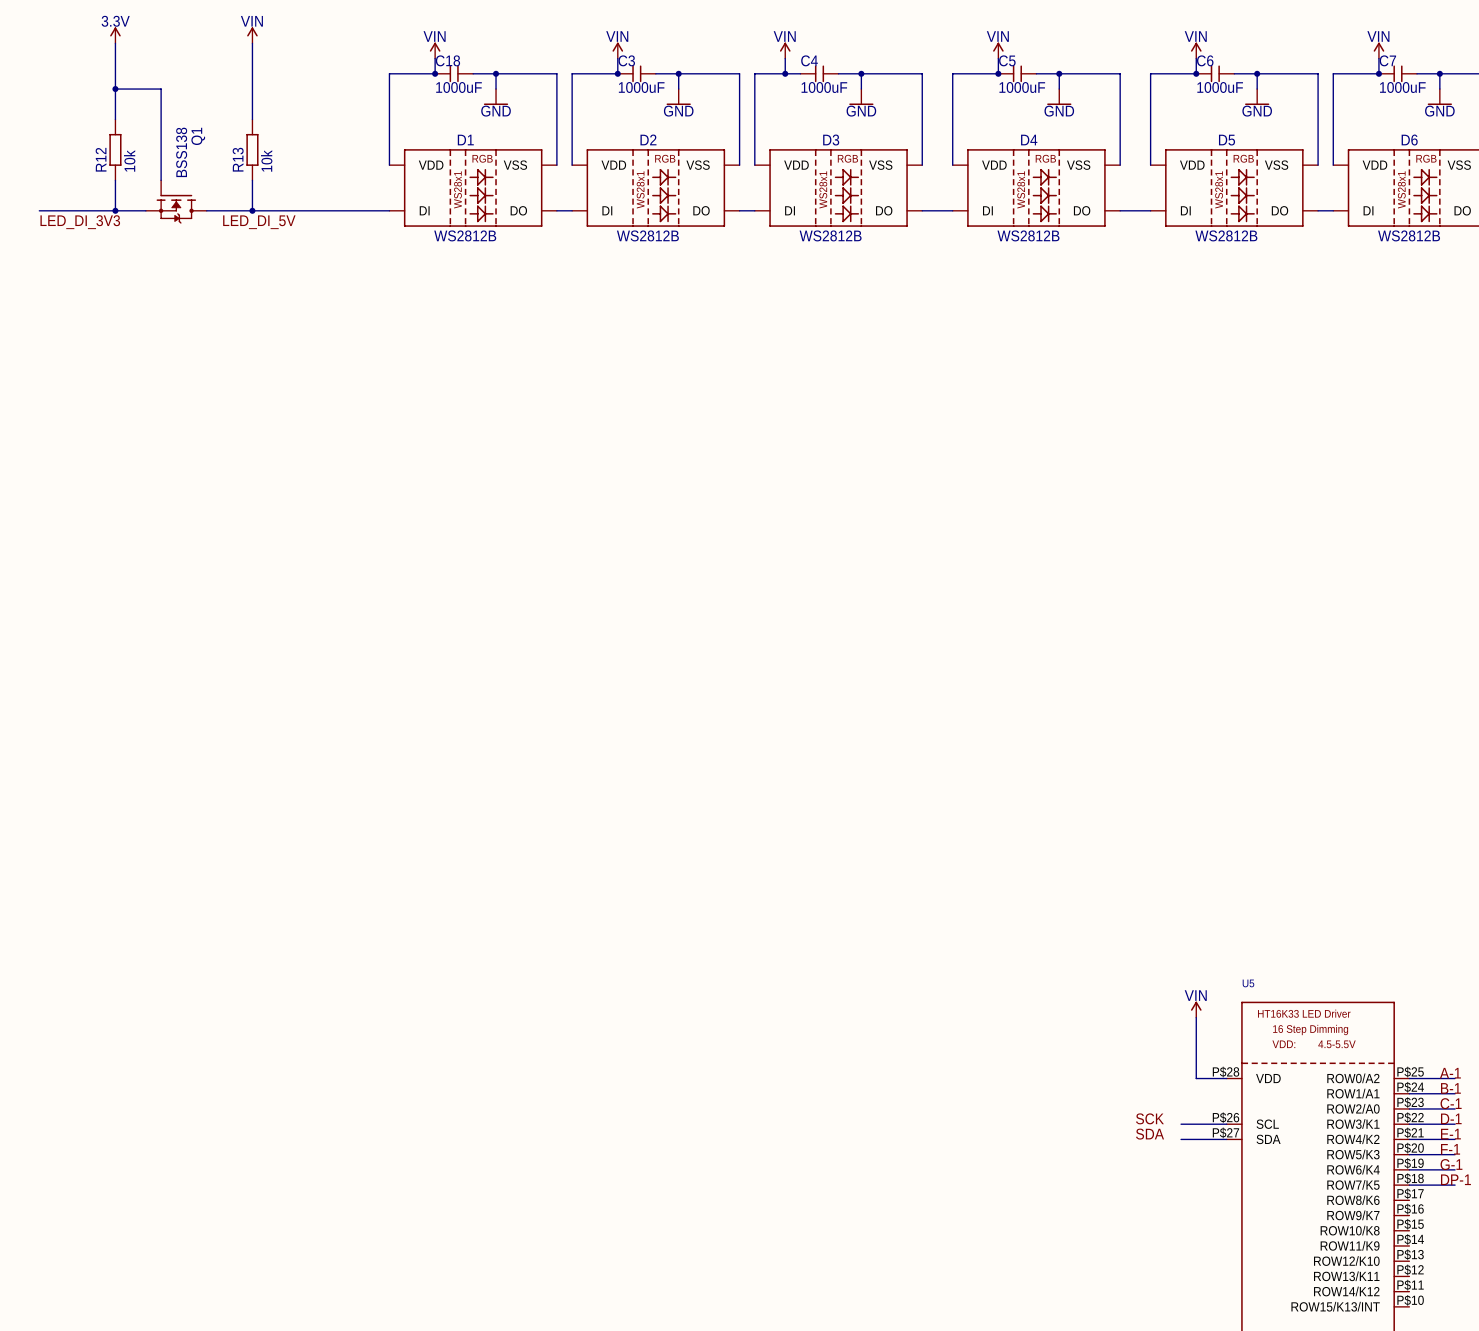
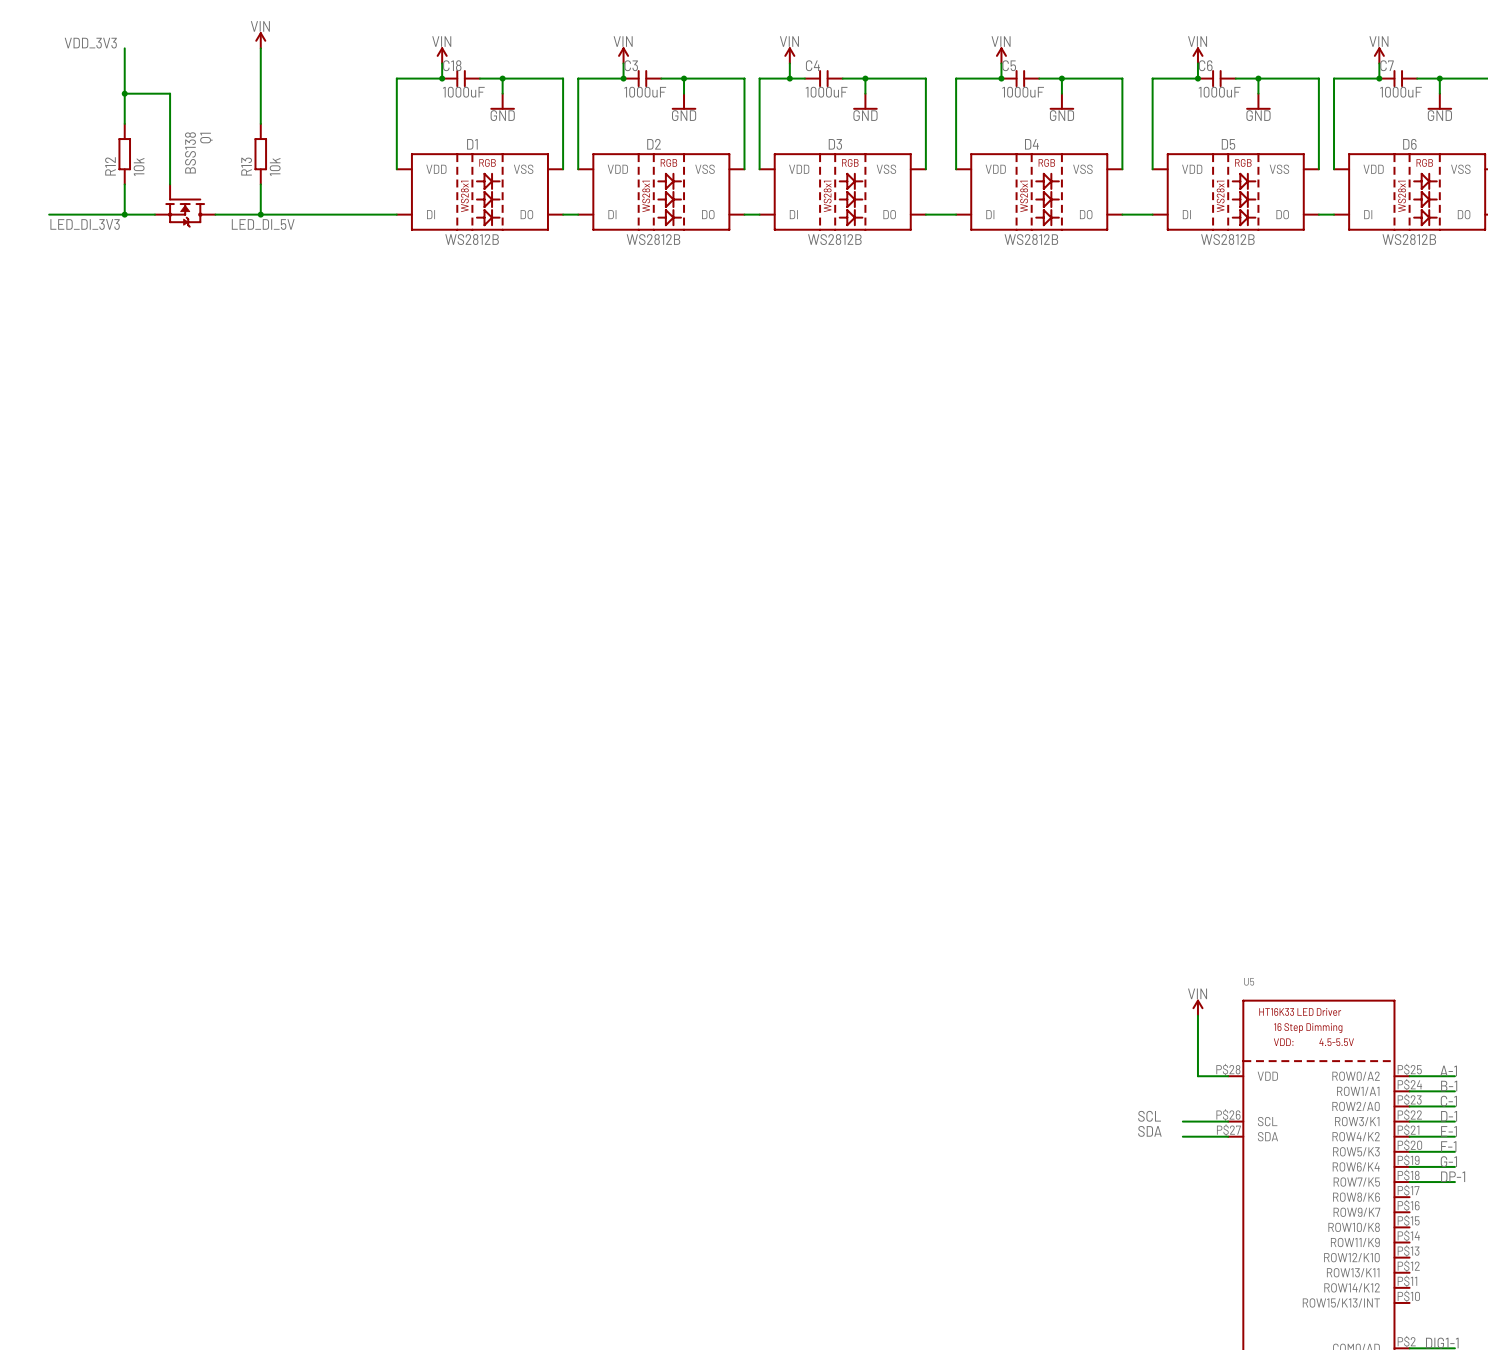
power symbol: 3.3V (115, 35) -> none
label: none -> VDD_3V3 (90, 43)
label: SCK (1149, 1118) -> SCL (1149, 1116)

